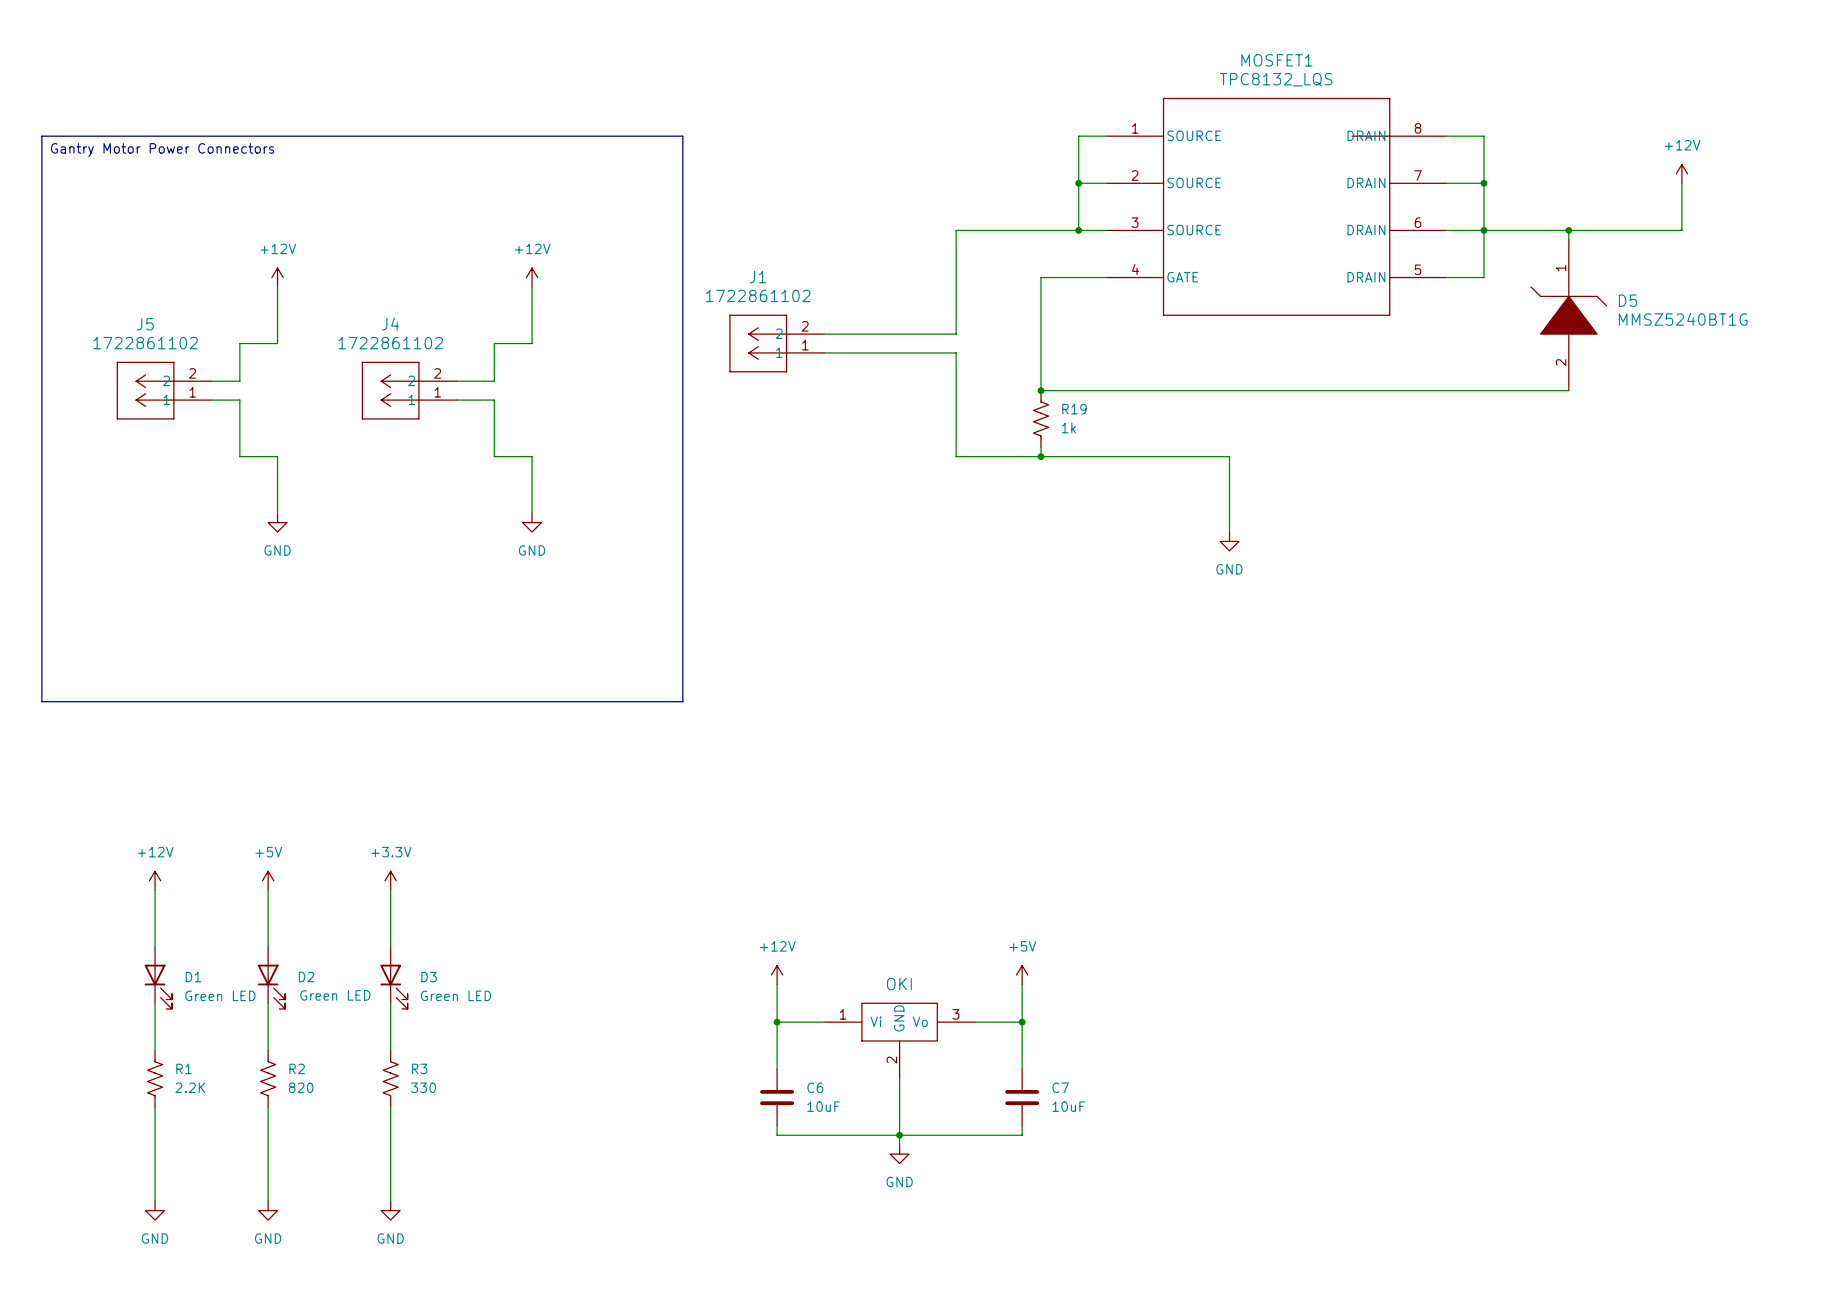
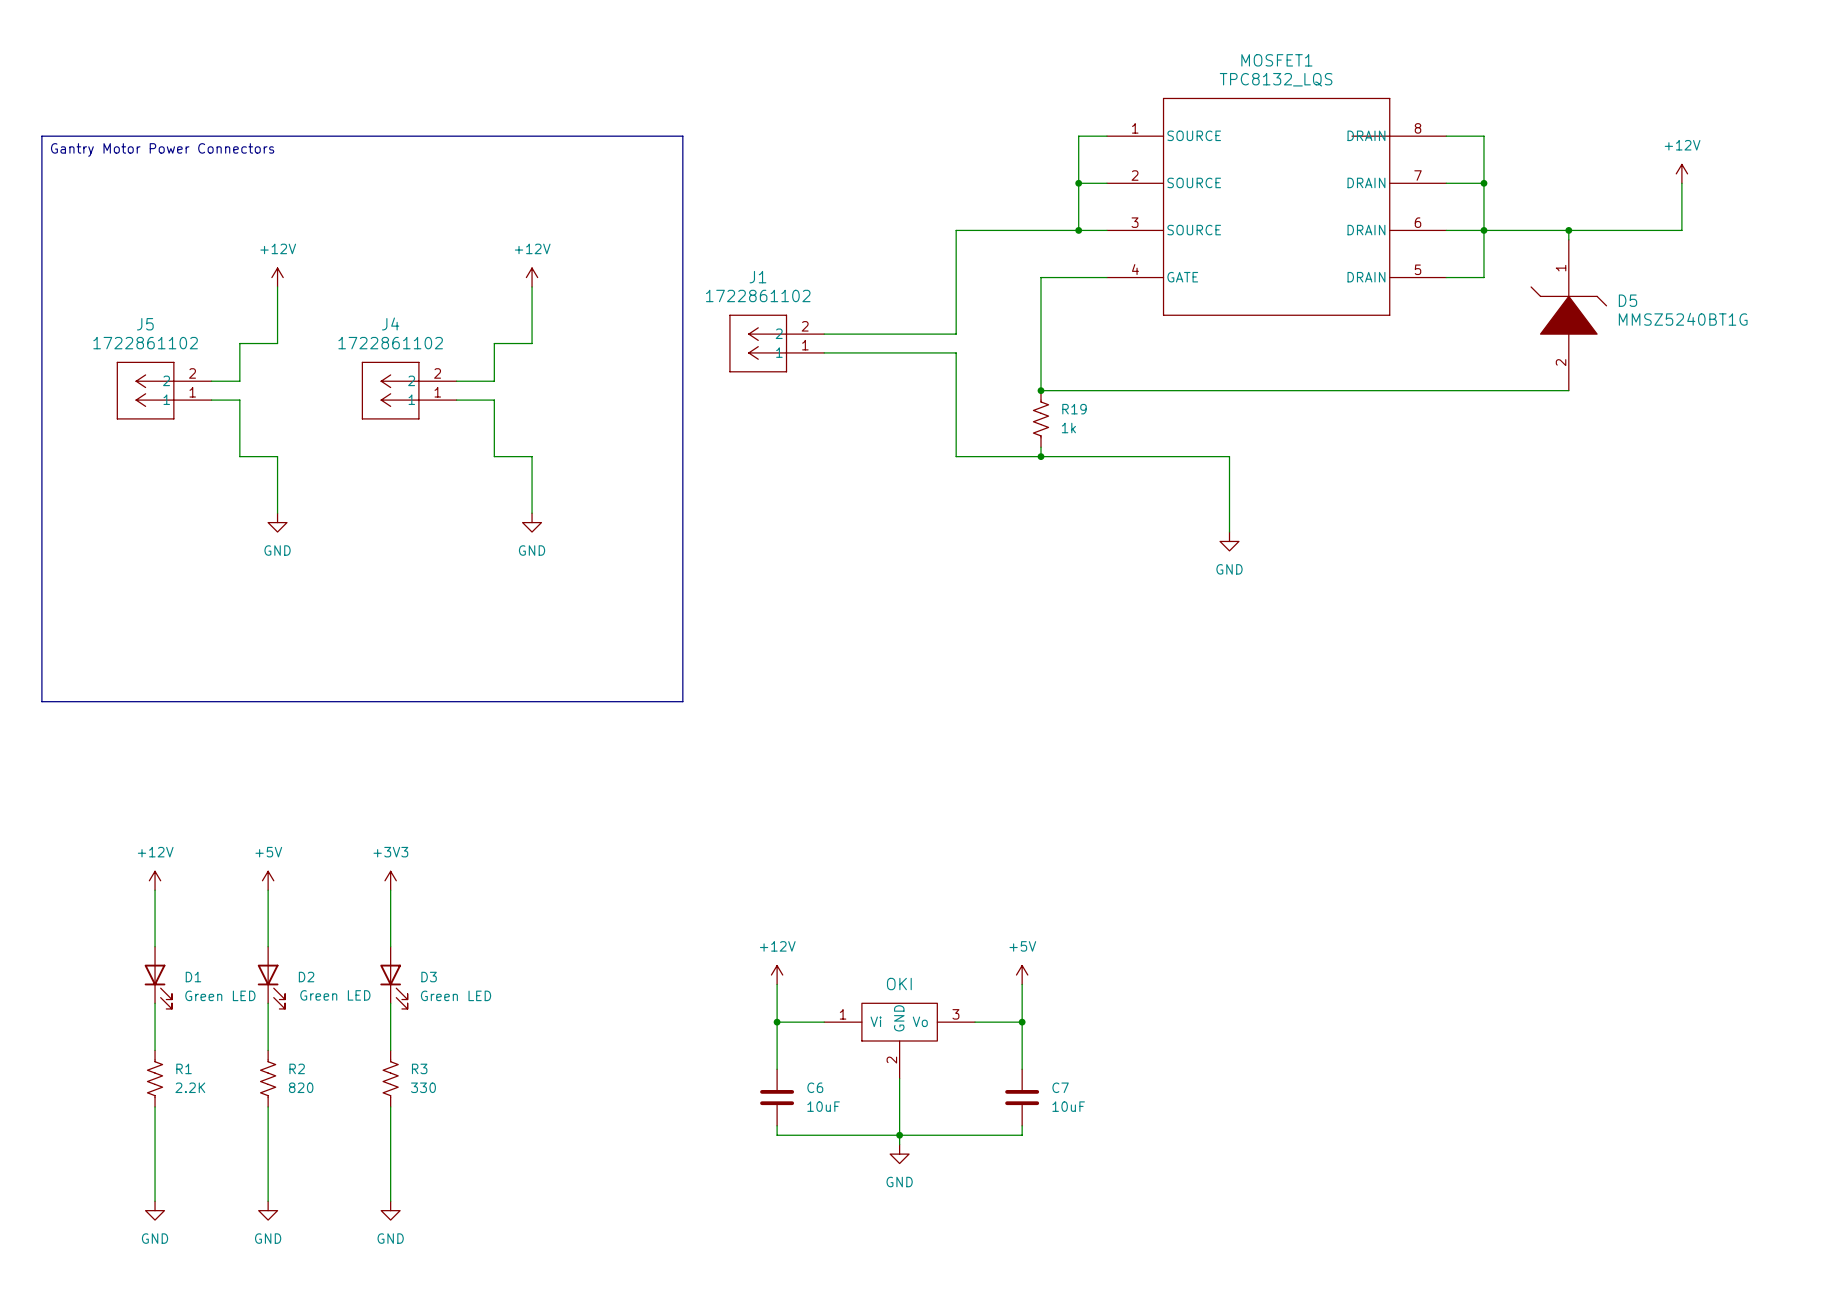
power symbol: +3.3V (390, 880) -> +3V3 (390, 880)

